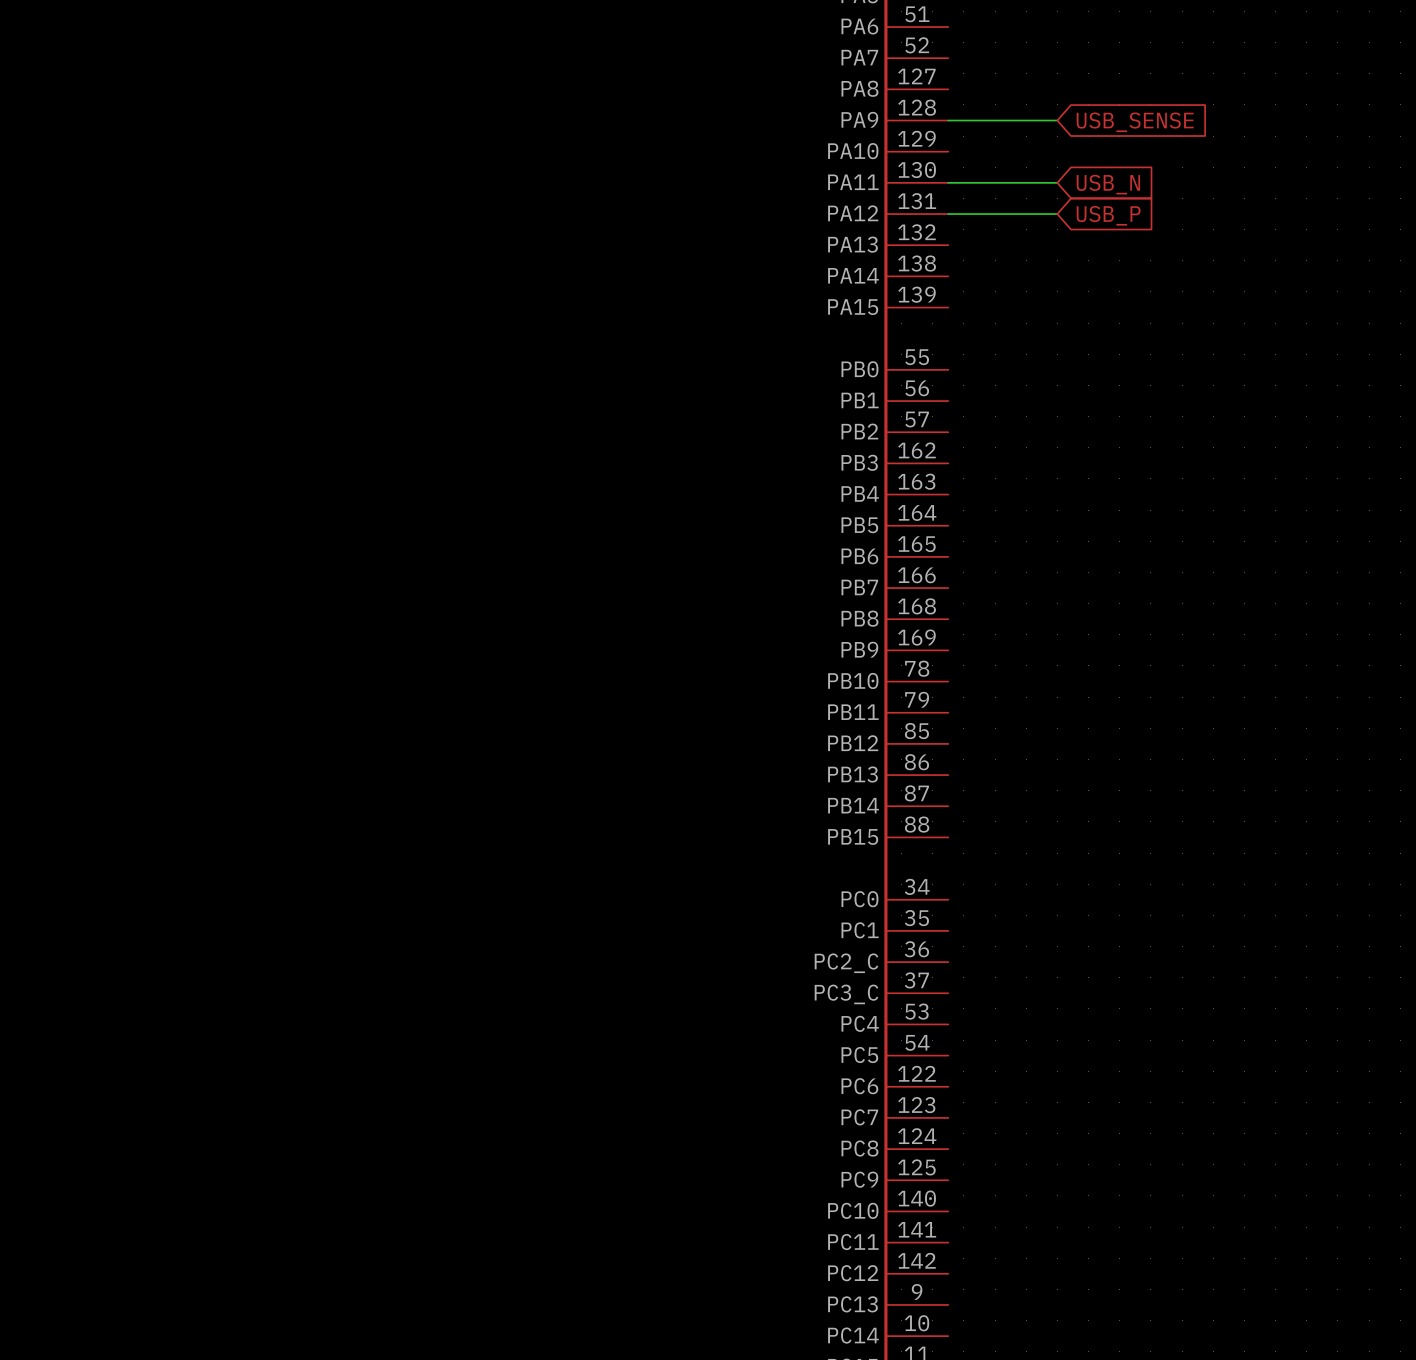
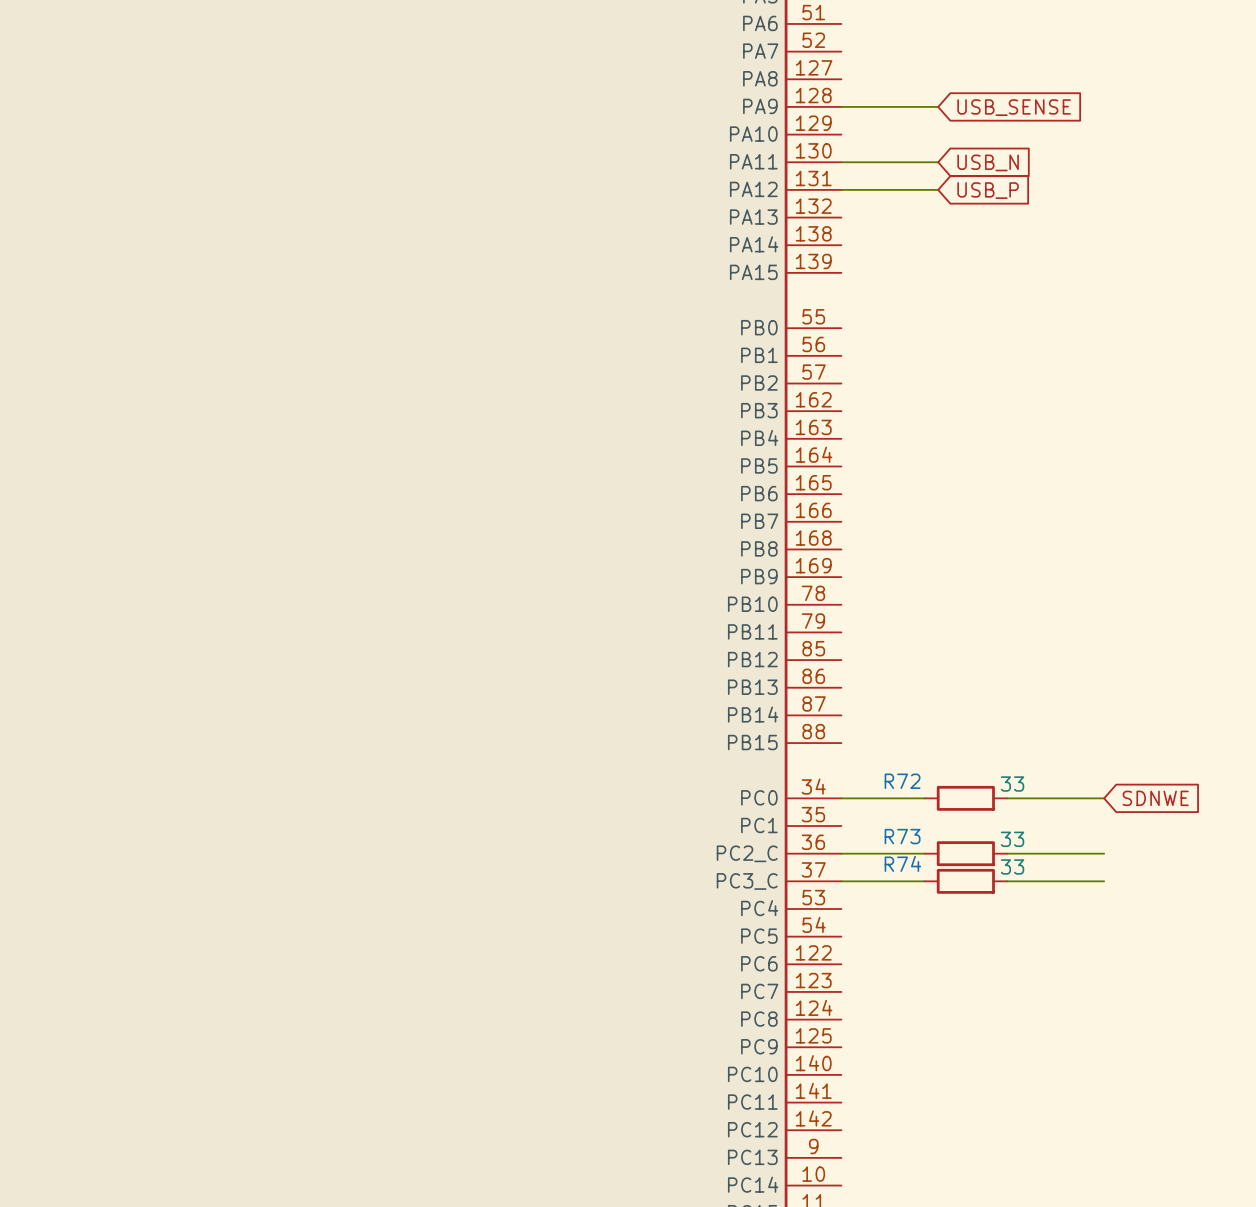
wire: none -> (841, 798) (924, 798)
R72: none -> 33 (965, 798)
wire: none -> (1007, 798) (1104, 798)
global label: none -> SDNWE (1155, 798)
wire: none -> (841, 853) (924, 853)
R73: none -> 33 (965, 853)
wire: none -> (1007, 853) (1104, 853)
wire: none -> (841, 881) (924, 881)
R74: none -> 33 (965, 881)
wire: none -> (1007, 881) (1104, 881)

